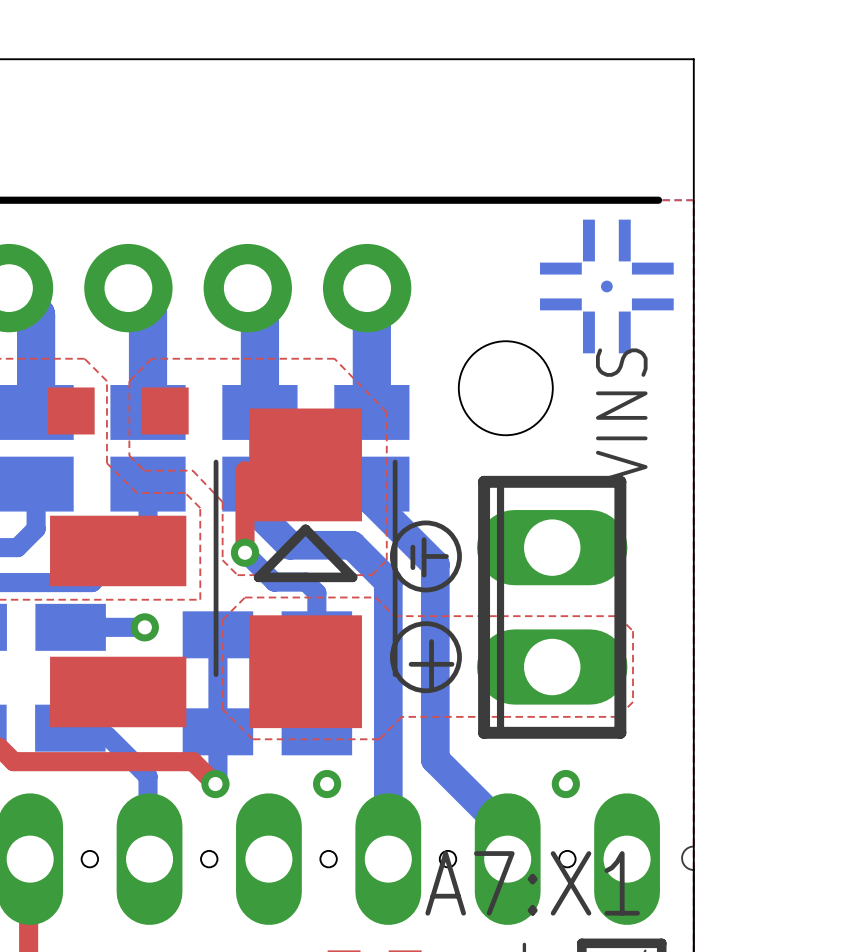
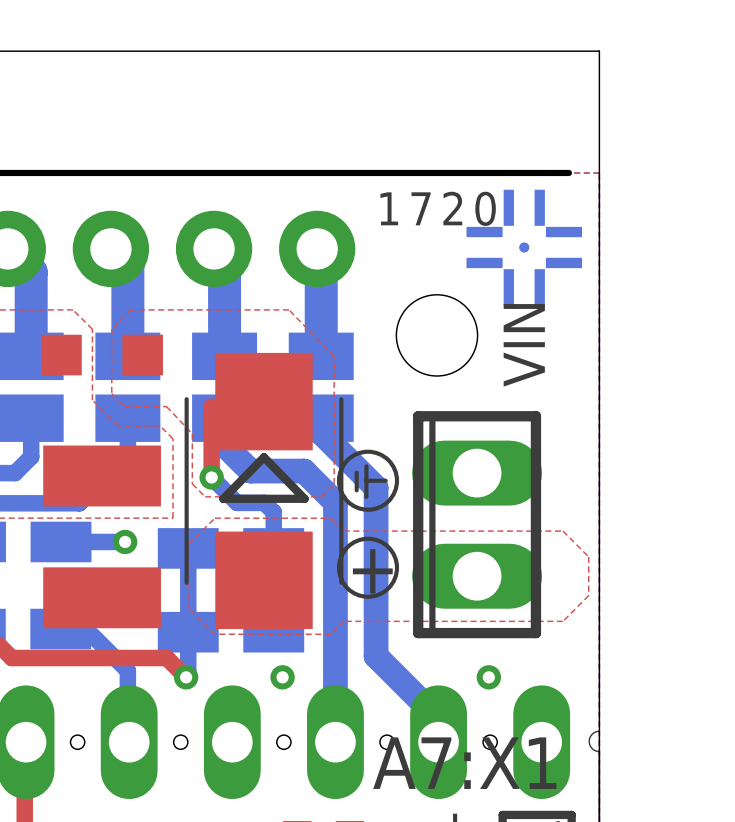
text: none -> 1 (389, 208)
text: none -> 7 (421, 208)
text: none -> 2 (452, 208)
text: none -> 0 (485, 208)
text: VINS (621, 415) -> VIN (524, 345)
top zone outline: (245, 597) (222, 619) (222, 709) (252, 739) (379, 739) (401, 716) (618, 716) (633, 701) (633, 631) (618, 616) (394, 616) (375, 597) (245, 597) -> (214, 518) (189, 544) (189, 608) (214, 634) (330, 634) (343, 621) (562, 621) (588, 595) (588, 556) (562, 531) (343, 531) (330, 518) (214, 518)

